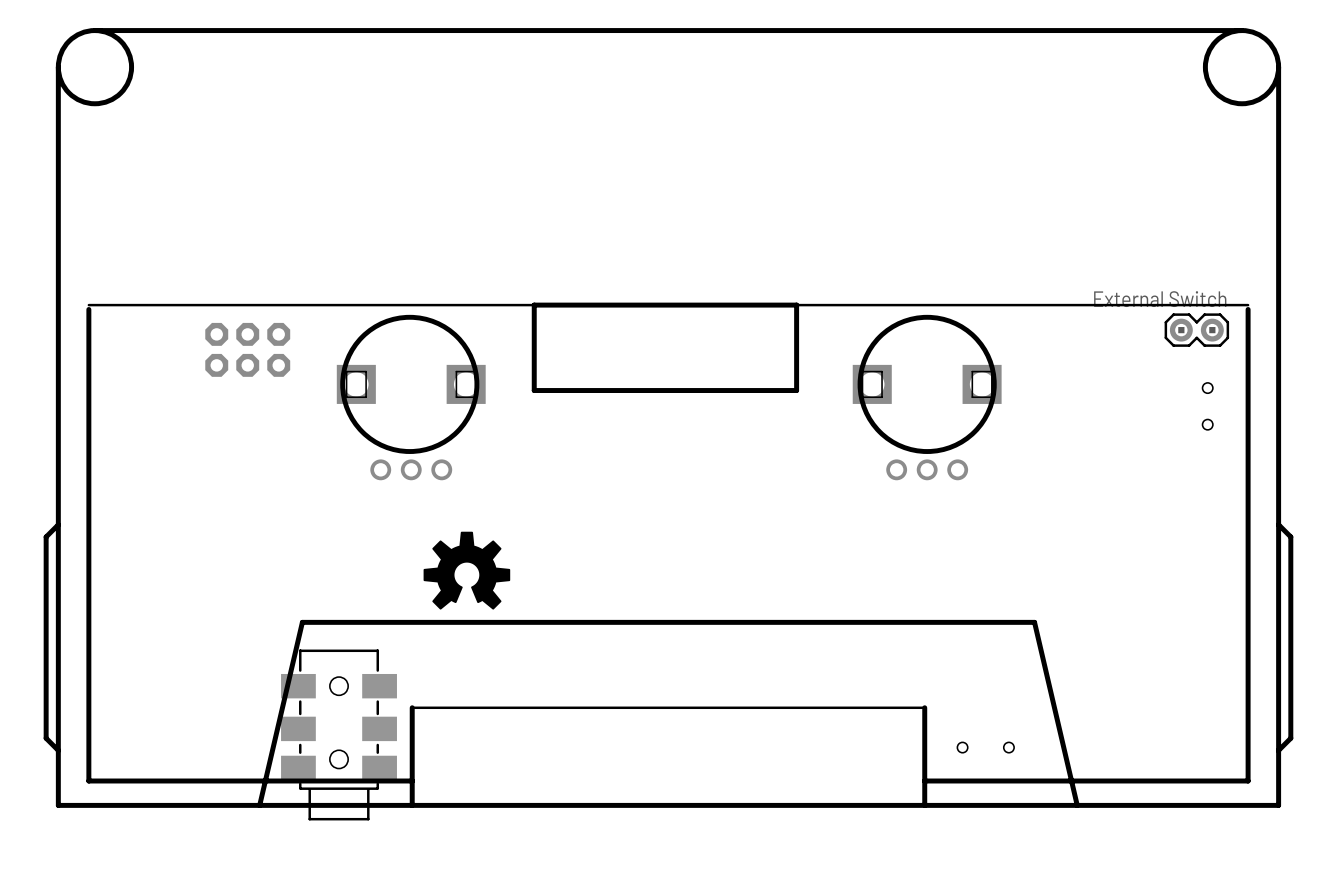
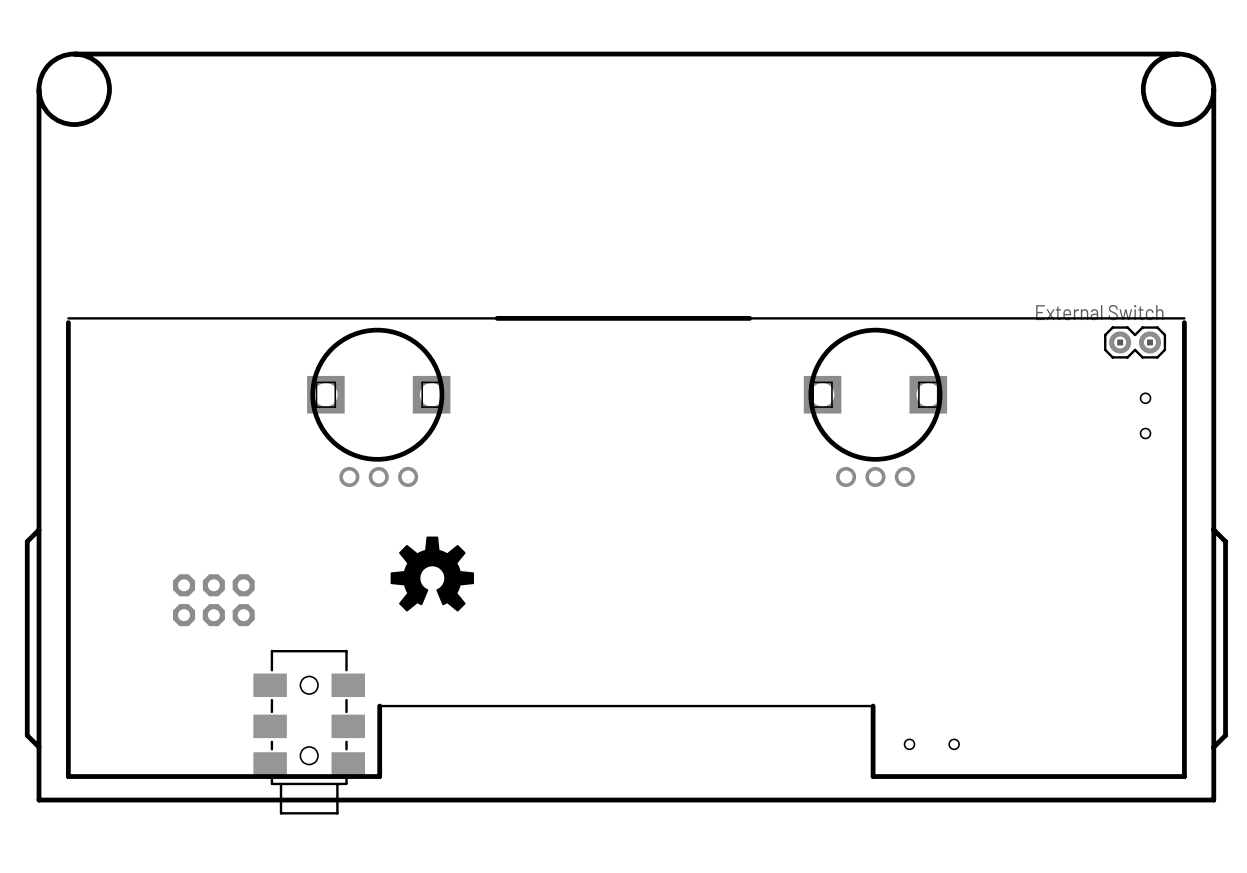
board edge: (796, 305) (796, 390) (534, 390) (534, 305) -> none
part position: (247, 349) -> (213, 600)
board edge: (412, 780) (412, 805) -> none
board edge: (924, 780) (924, 805) -> none
board edge: (1077, 805) (1034, 622) (302, 622) (259, 805) -> none

